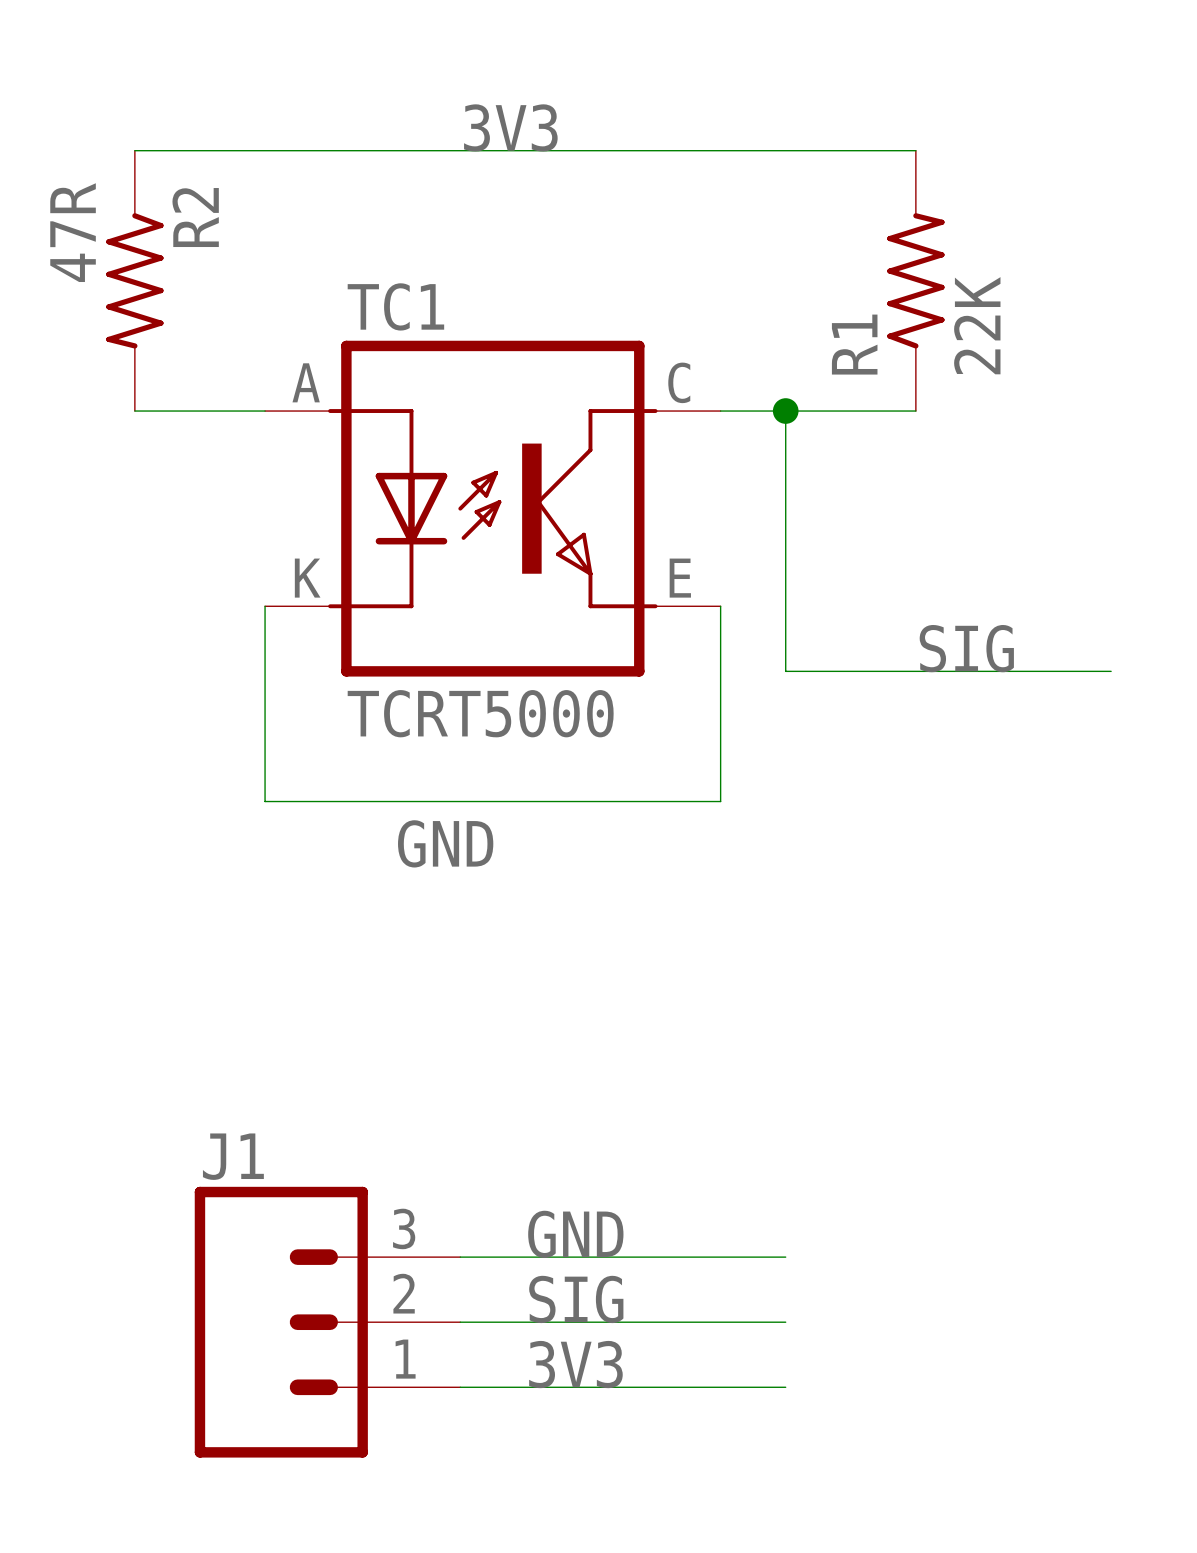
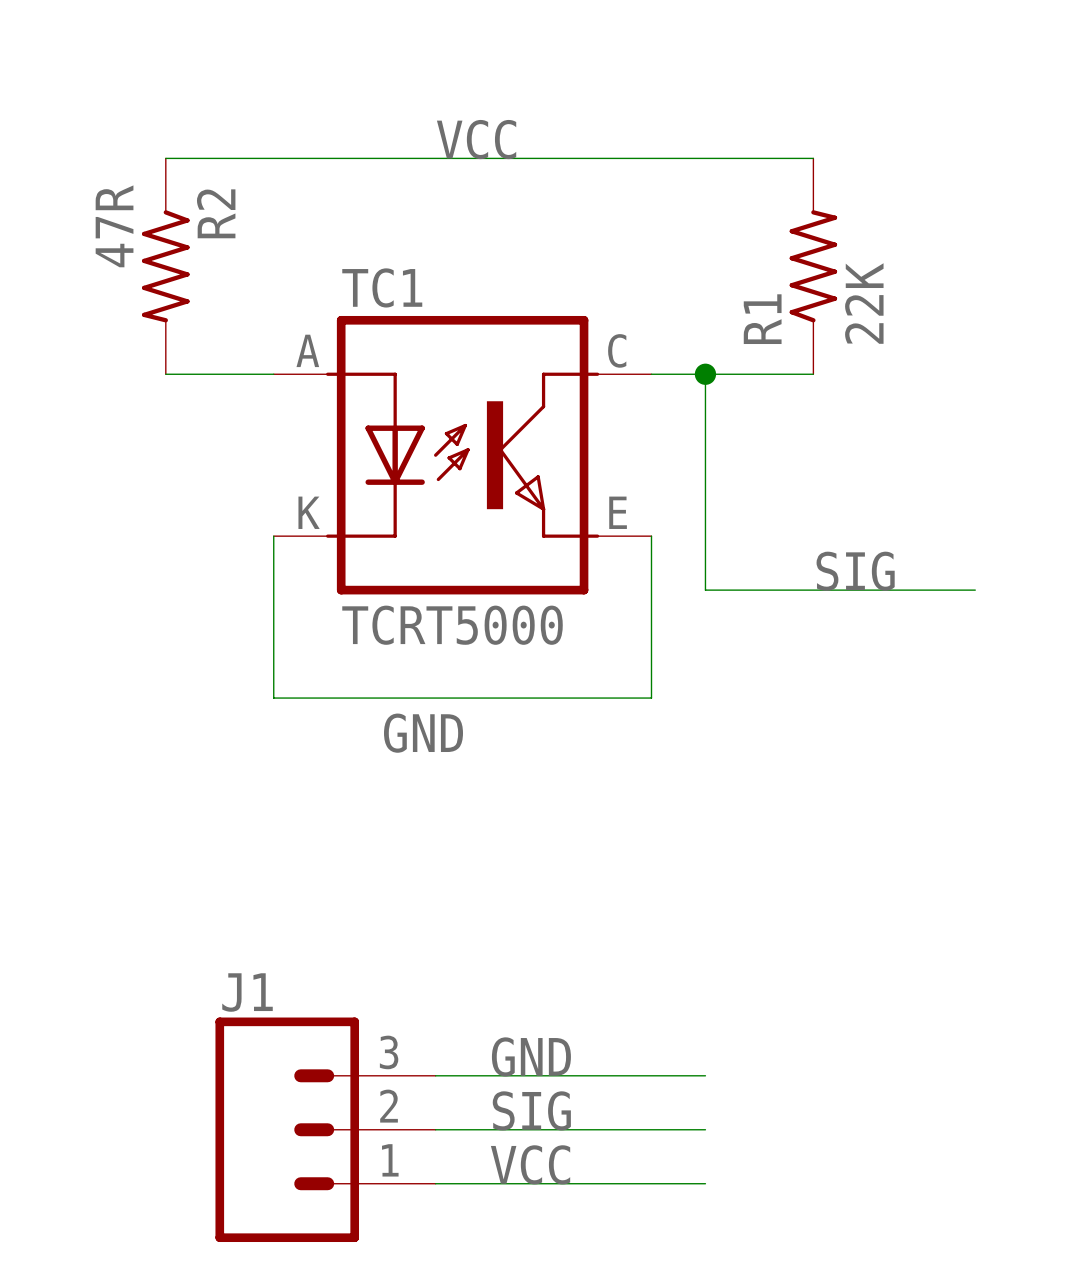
label: 3V3 (510, 127) -> VCC (476, 139)
label: 3V3 (575, 1364) -> VCC (530, 1164)

